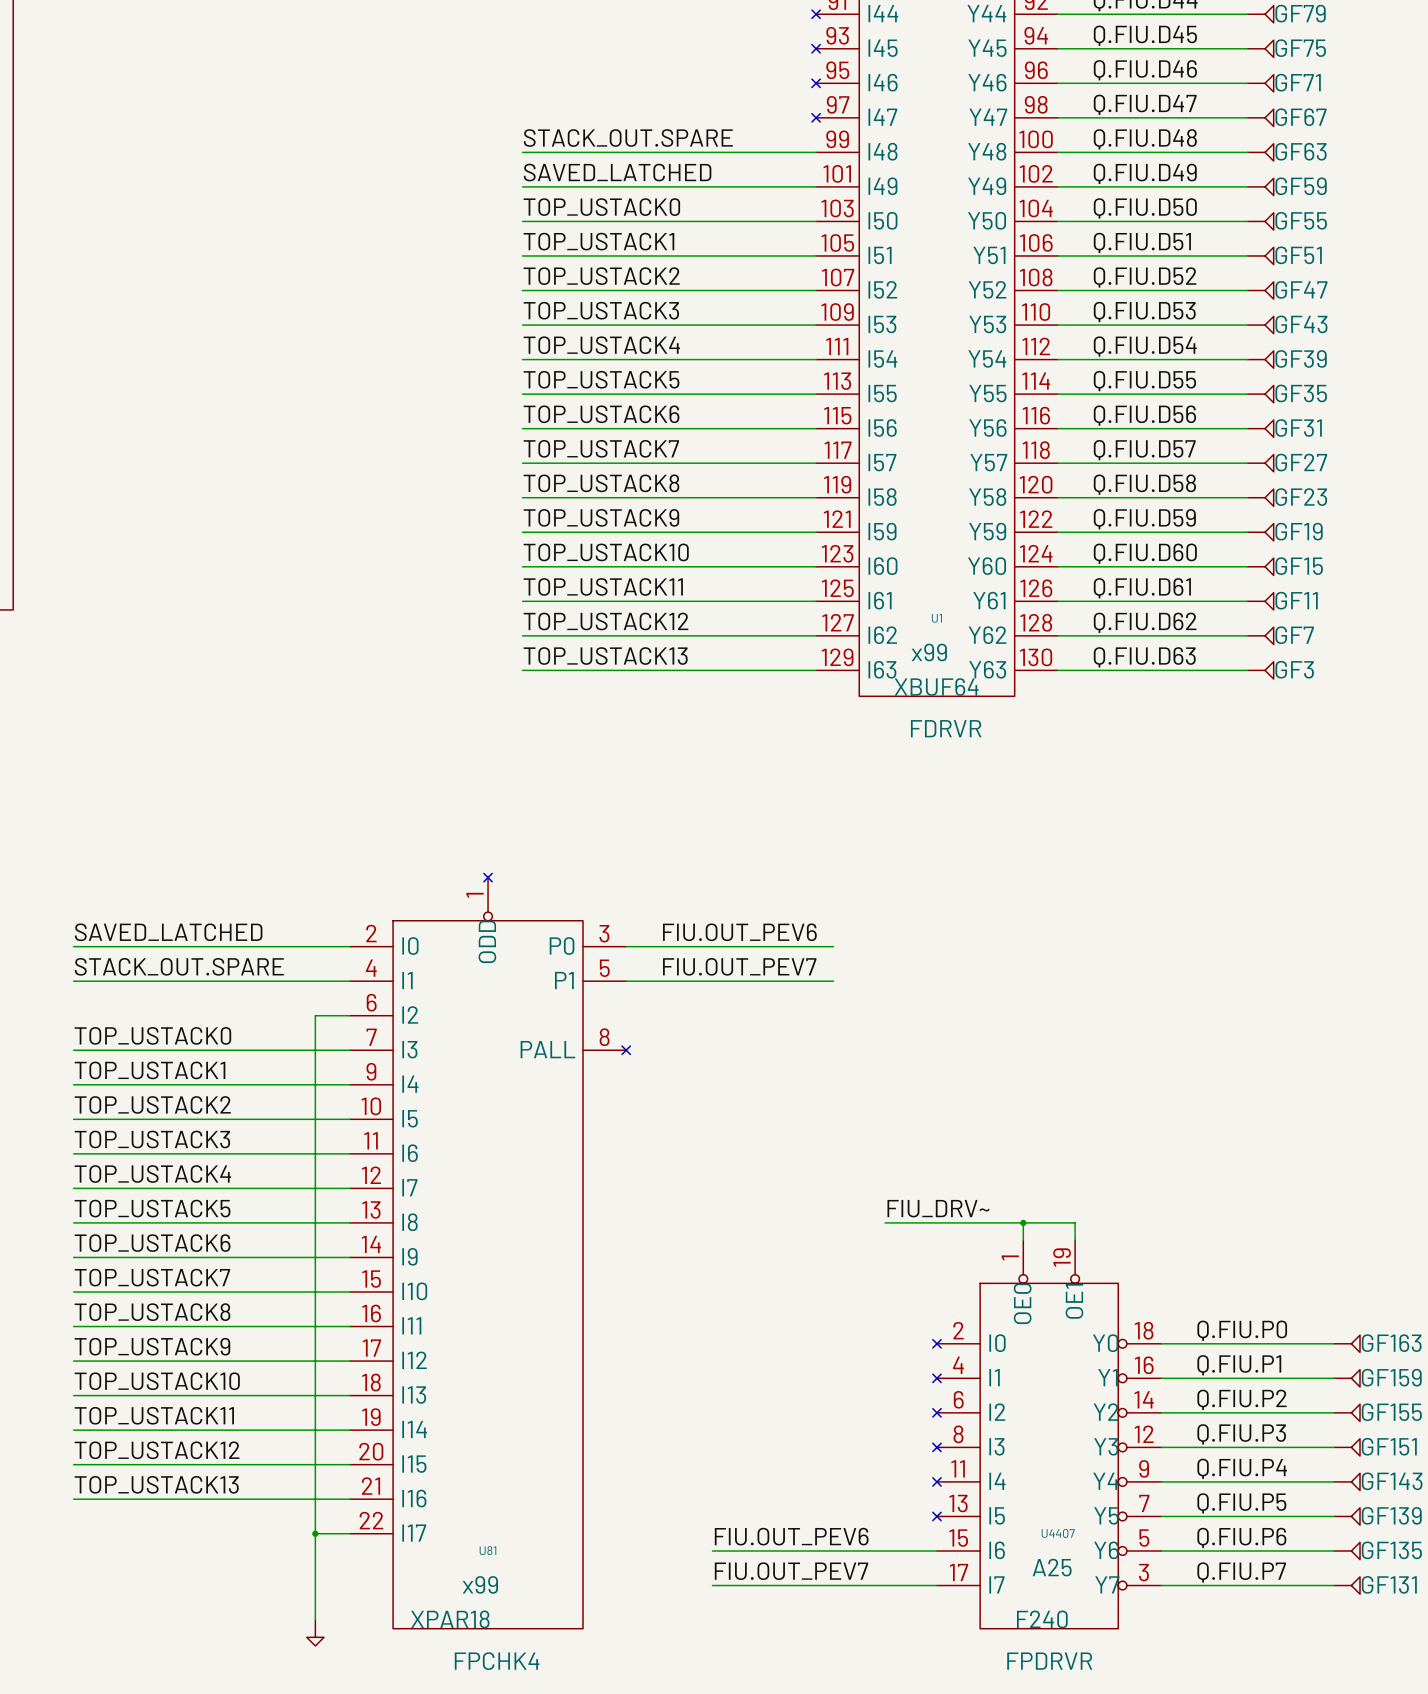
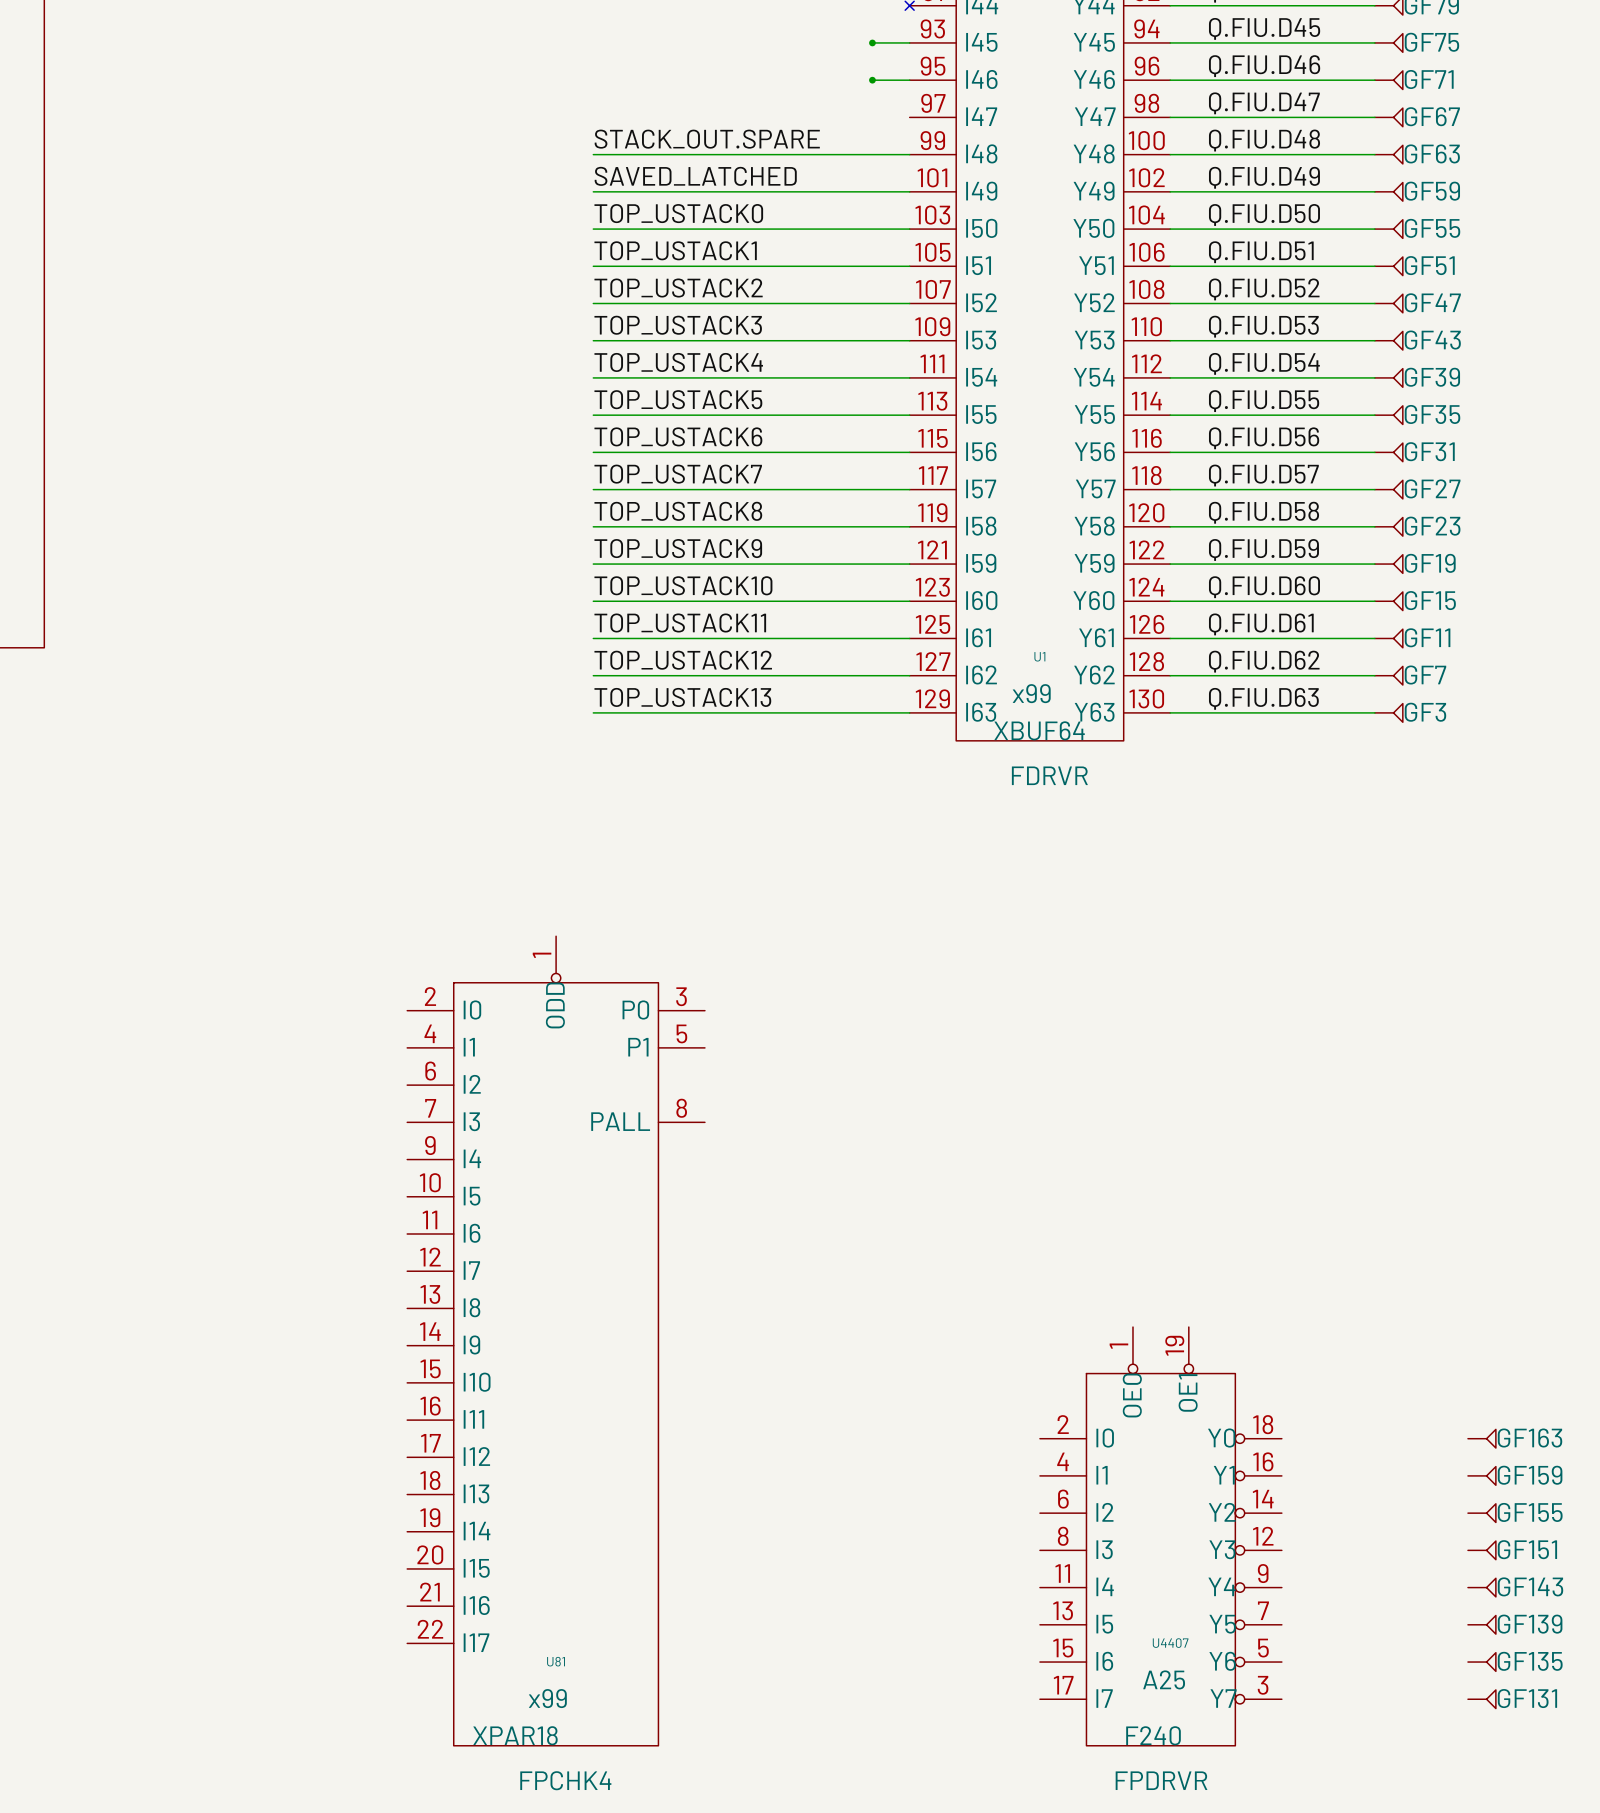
wire: none -> (872, 42) (909, 42)
junction: none -> (872, 42)
no-connect mark: (816, 48) -> none
wire: none -> (872, 80) (909, 80)
junction: none -> (872, 80)
no-connect mark: (816, 83) -> none
no-connect mark: (816, 117) -> none
no-connect mark: (488, 877) -> none
label: SAVED_LATCHED (168, 932) -> none
label: FIU.OUT_PEV6 (739, 932) -> none
wire: (73, 946) (349, 946) -> none
wire: (626, 946) (833, 946) -> none
label: STACK_OUT.SPARE (179, 966) -> none
label: FIU.OUT_PEV7 (739, 966) -> none
wire: (73, 981) (349, 981) -> none
wire: (626, 981) (833, 981) -> none
wire: (349, 1015) (315, 1015) (315, 1620) -> none
label: TOP_USTACK0 (152, 1035) -> none
wire: (73, 1050) (349, 1050) -> none
no-connect mark: (626, 1050) -> none
label: TOP_USTACK1 (150, 1070) -> none
wire: (73, 1084) (349, 1084) -> none
label: TOP_USTACK2 (152, 1104) -> none
wire: (73, 1119) (349, 1119) -> none
label: TOP_USTACK3 (152, 1139) -> none
wire: (73, 1153) (349, 1153) -> none
label: TOP_USTACK4 (152, 1174) -> none
wire: (73, 1188) (349, 1188) -> none
label: TOP_USTACK5 (152, 1208) -> none
label: FIU_DRV~ (938, 1208) -> none
wire: (73, 1222) (349, 1222) -> none
wire: (885, 1222) (1075, 1222) (1075, 1240) -> none
wire: (1023, 1222) (1023, 1240) -> none
junction: (1023, 1222) -> none
label: TOP_USTACK6 (152, 1243) -> none
wire: (73, 1257) (349, 1257) -> none
label: TOP_USTACK7 (152, 1277) -> none
wire: (73, 1291) (349, 1291) -> none
label: TOP_USTACK8 (152, 1312) -> none
wire: (73, 1326) (349, 1326) -> none
label: Q.FIU.P0 (1242, 1330) -> none
no-connect mark: (936, 1343) -> none
wire: (1161, 1343) (1334, 1343) -> none
label: TOP_USTACK9 (152, 1346) -> none
wire: (73, 1361) (349, 1361) -> none
label: Q.FIU.P1 (1239, 1365) -> none
no-connect mark: (936, 1378) -> none
wire: (1161, 1378) (1334, 1378) -> none
label: TOP_USTACK10 (157, 1381) -> none
wire: (73, 1395) (349, 1395) -> none
label: Q.FIU.P2 (1242, 1399) -> none
no-connect mark: (936, 1412) -> none
wire: (1161, 1412) (1334, 1412) -> none
label: TOP_USTACK11 (154, 1415) -> none
wire: (73, 1430) (349, 1430) -> none
label: Q.FIU.P3 (1241, 1434) -> none
no-connect mark: (936, 1447) -> none
wire: (1161, 1447) (1334, 1447) -> none
label: TOP_USTACK12 (157, 1450) -> none
wire: (73, 1464) (349, 1464) -> none
label: Q.FIU.P4 (1242, 1468) -> none
no-connect mark: (936, 1481) -> none
wire: (1161, 1481) (1334, 1481) -> none
label: TOP_USTACK13 (156, 1484) -> none
wire: (73, 1499) (349, 1499) -> none
label: Q.FIU.P5 (1241, 1503) -> none
no-connect mark: (936, 1516) -> none
wire: (1161, 1516) (1334, 1516) -> none
wire: (315, 1533) (349, 1533) -> none
junction: (315, 1533) -> none
label: FIU.OUT_PEV6 (791, 1536) -> none
label: Q.FIU.P6 (1241, 1537) -> none
wire: (712, 1550) (936, 1550) -> none
wire: (1161, 1550) (1334, 1550) -> none
label: FIU.OUT_PEV7 (791, 1571) -> none
label: Q.FIU.P7 (1241, 1572) -> none
wire: (712, 1585) (936, 1585) -> none
wire: (1161, 1585) (1334, 1585) -> none
power symbol: (315, 1633) -> none

